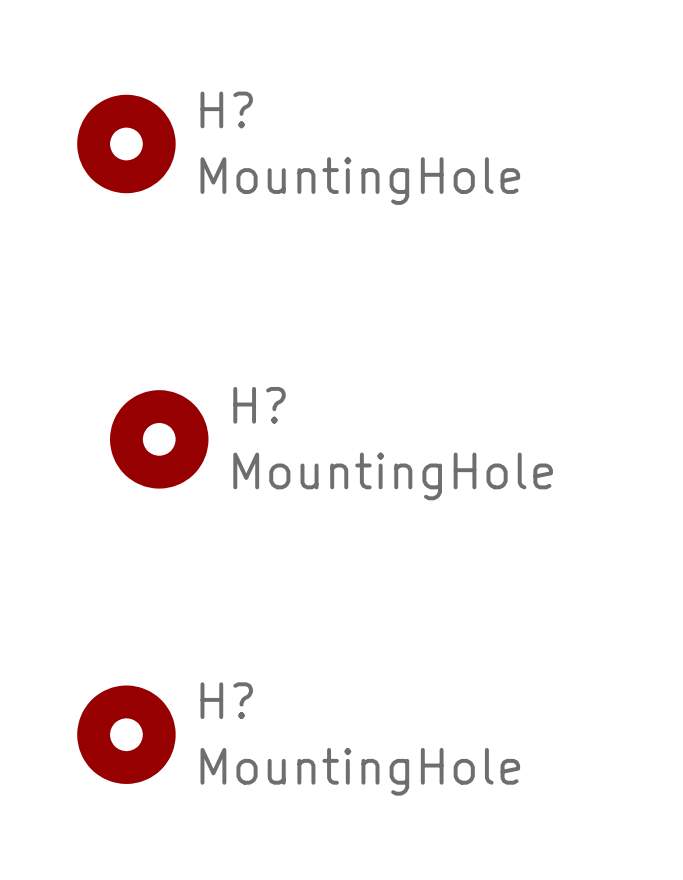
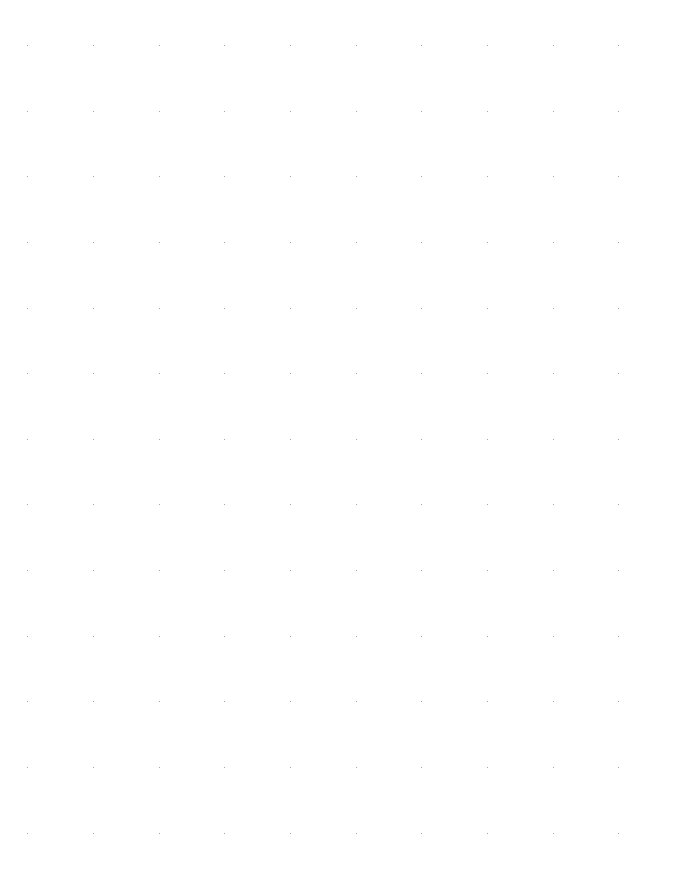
H?: MountingHole (126, 143) -> none
H?: MountingHole (159, 439) -> none
H?: MountingHole (126, 734) -> none

